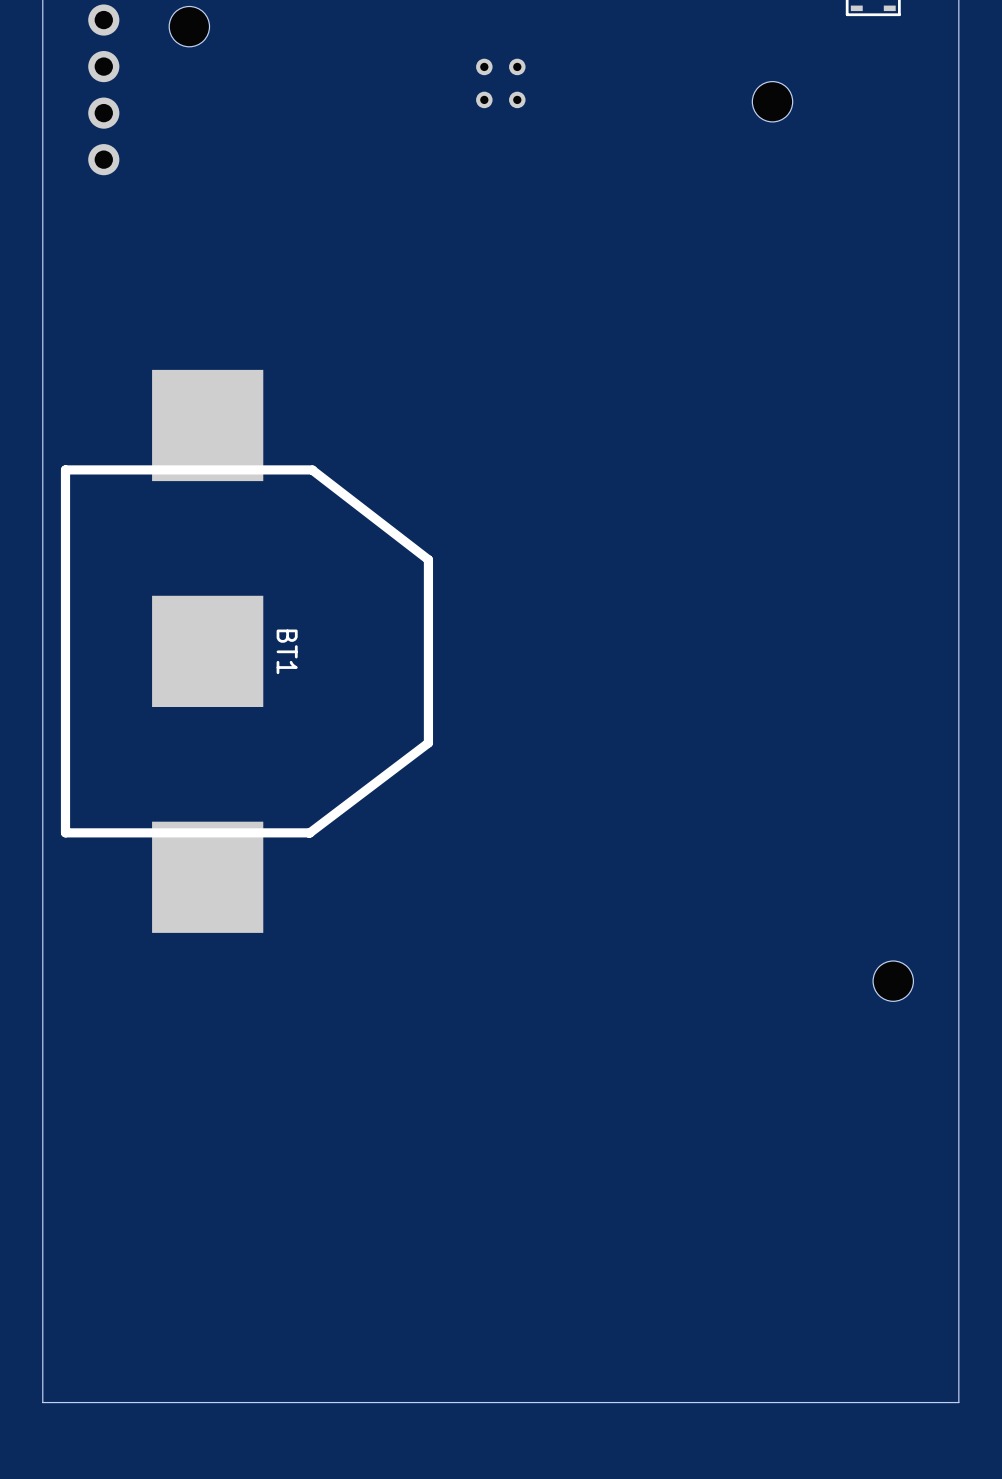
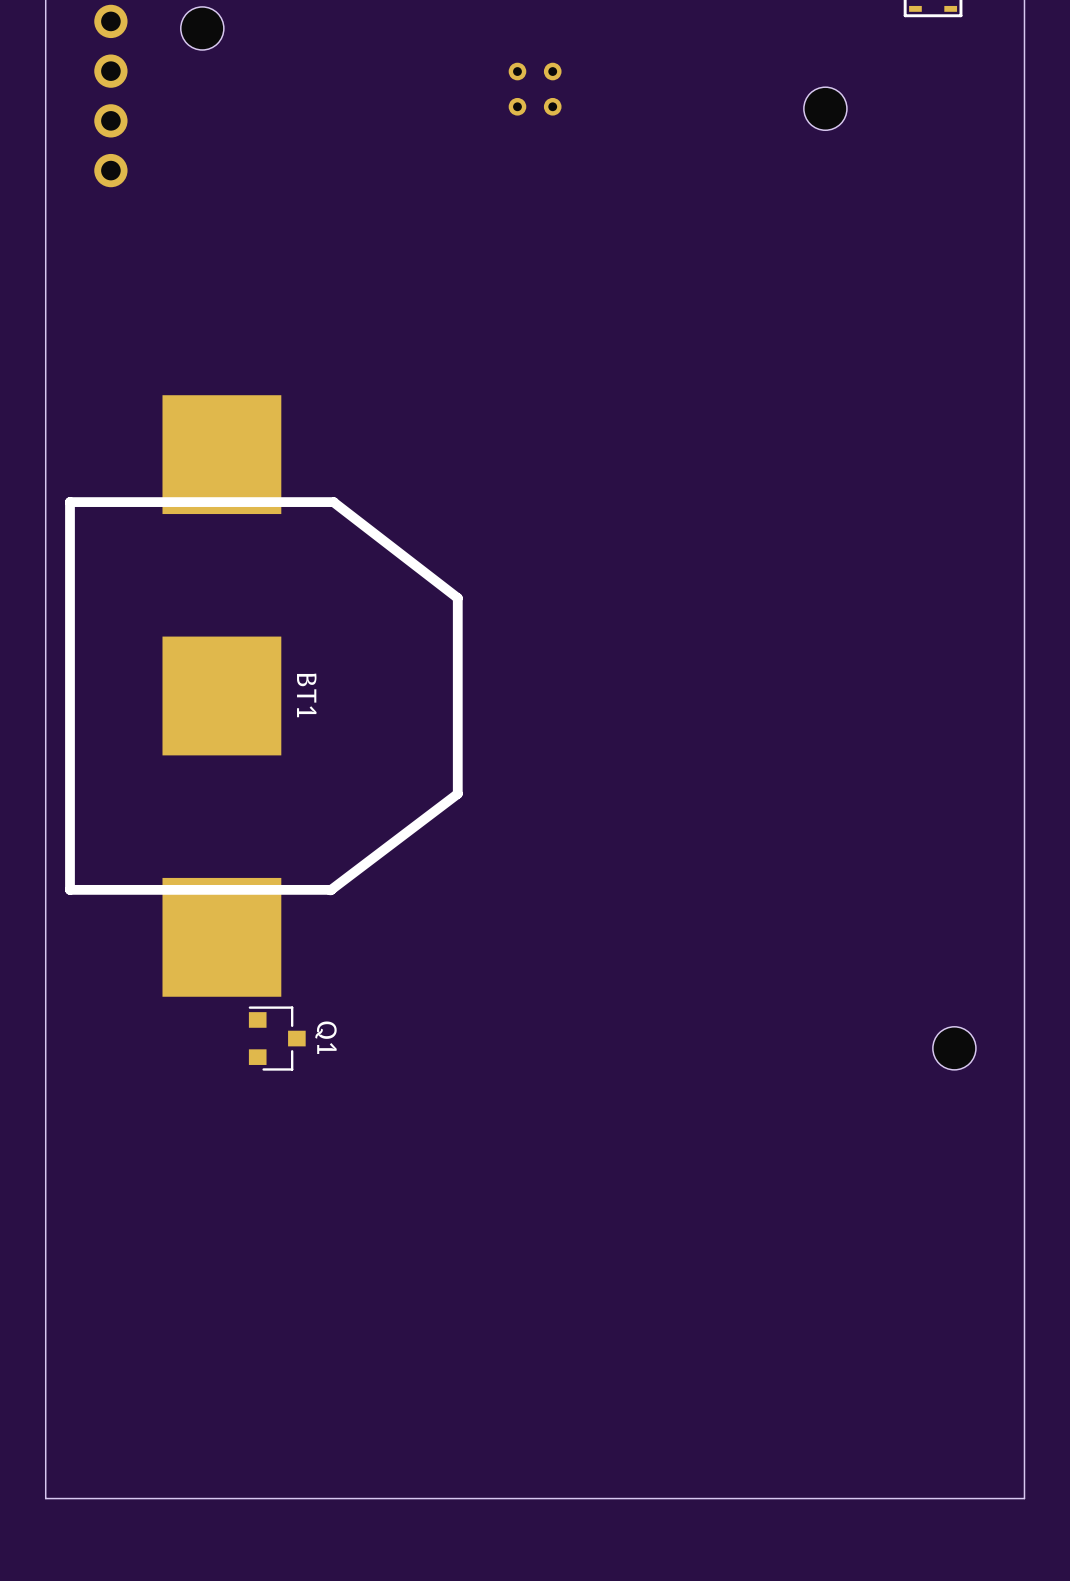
Q1: none -> (277, 1038)

